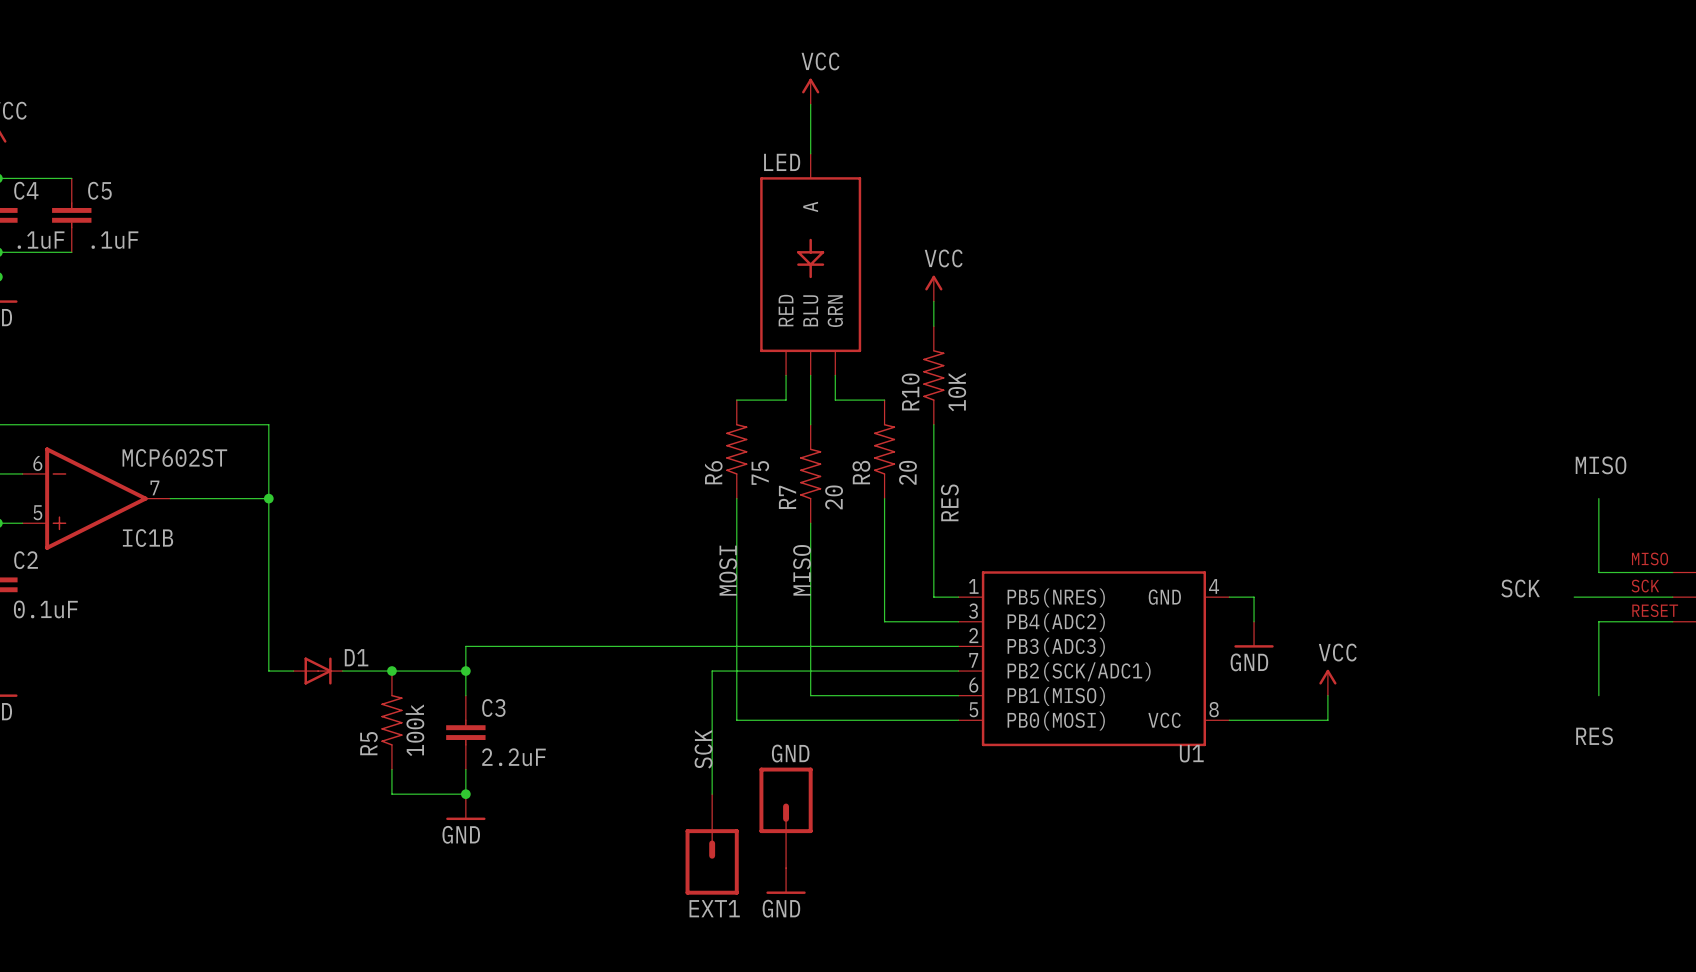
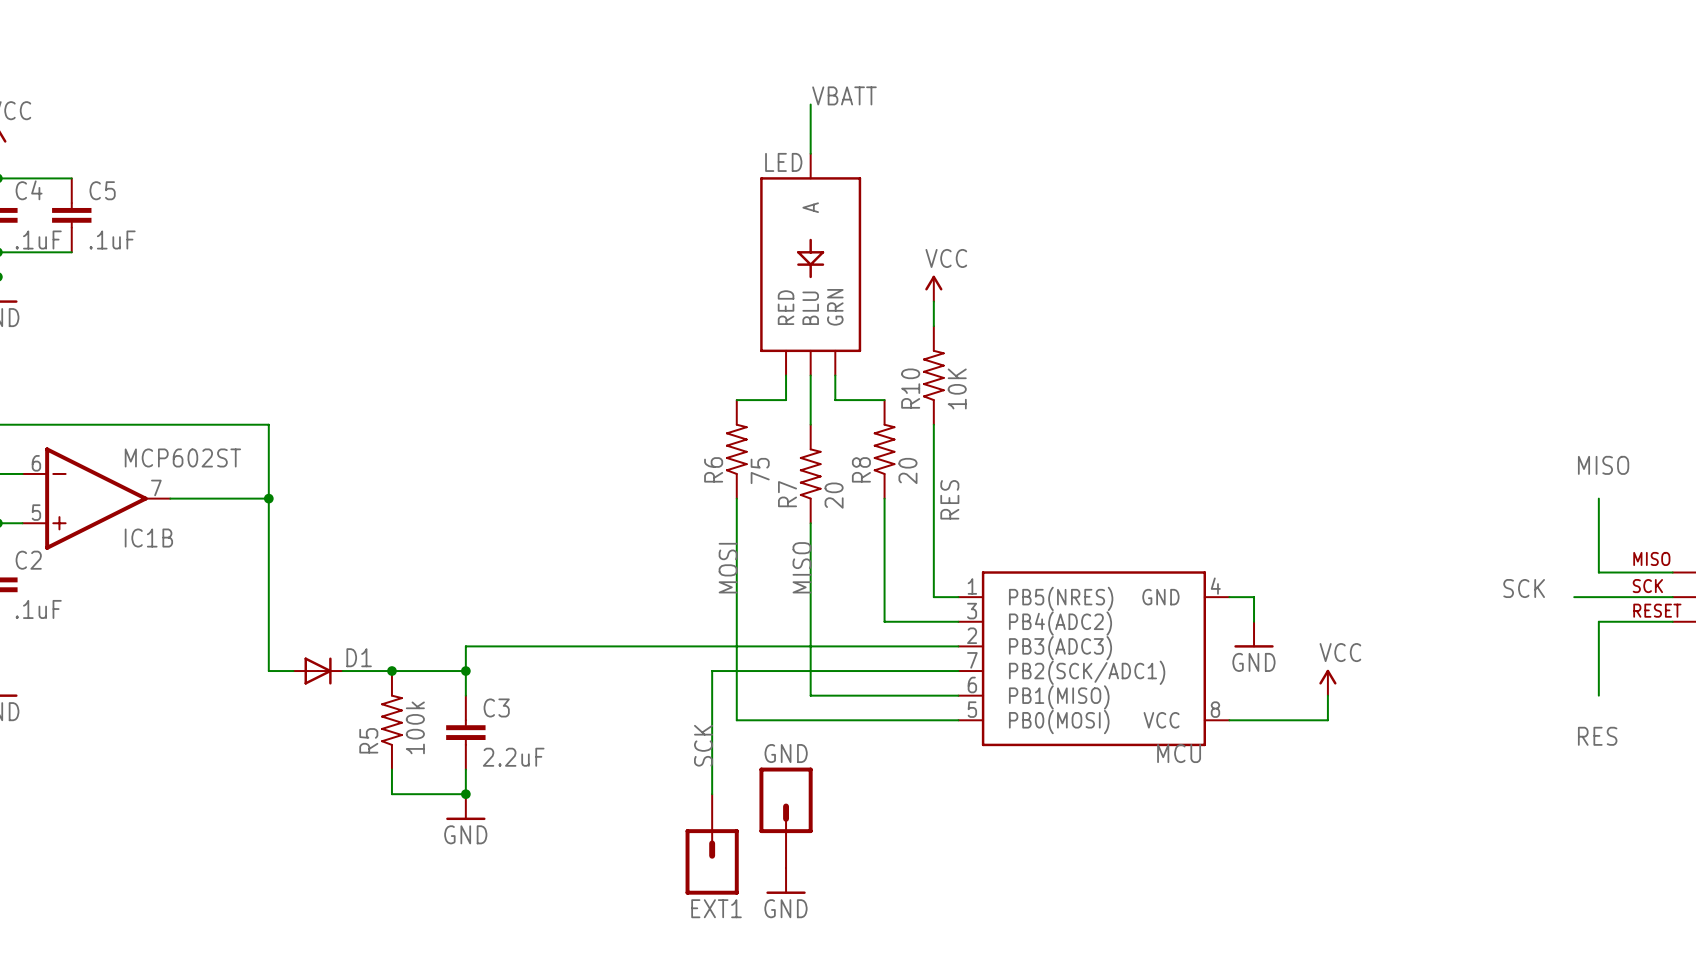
power symbol: VCC (810, 91) -> none
label: none -> VBATT (844, 95)
C2 value: 0.1uF (45, 609) -> .1uF (38, 609)
U1 name: U1 (1191, 753) -> MCU (1179, 753)

